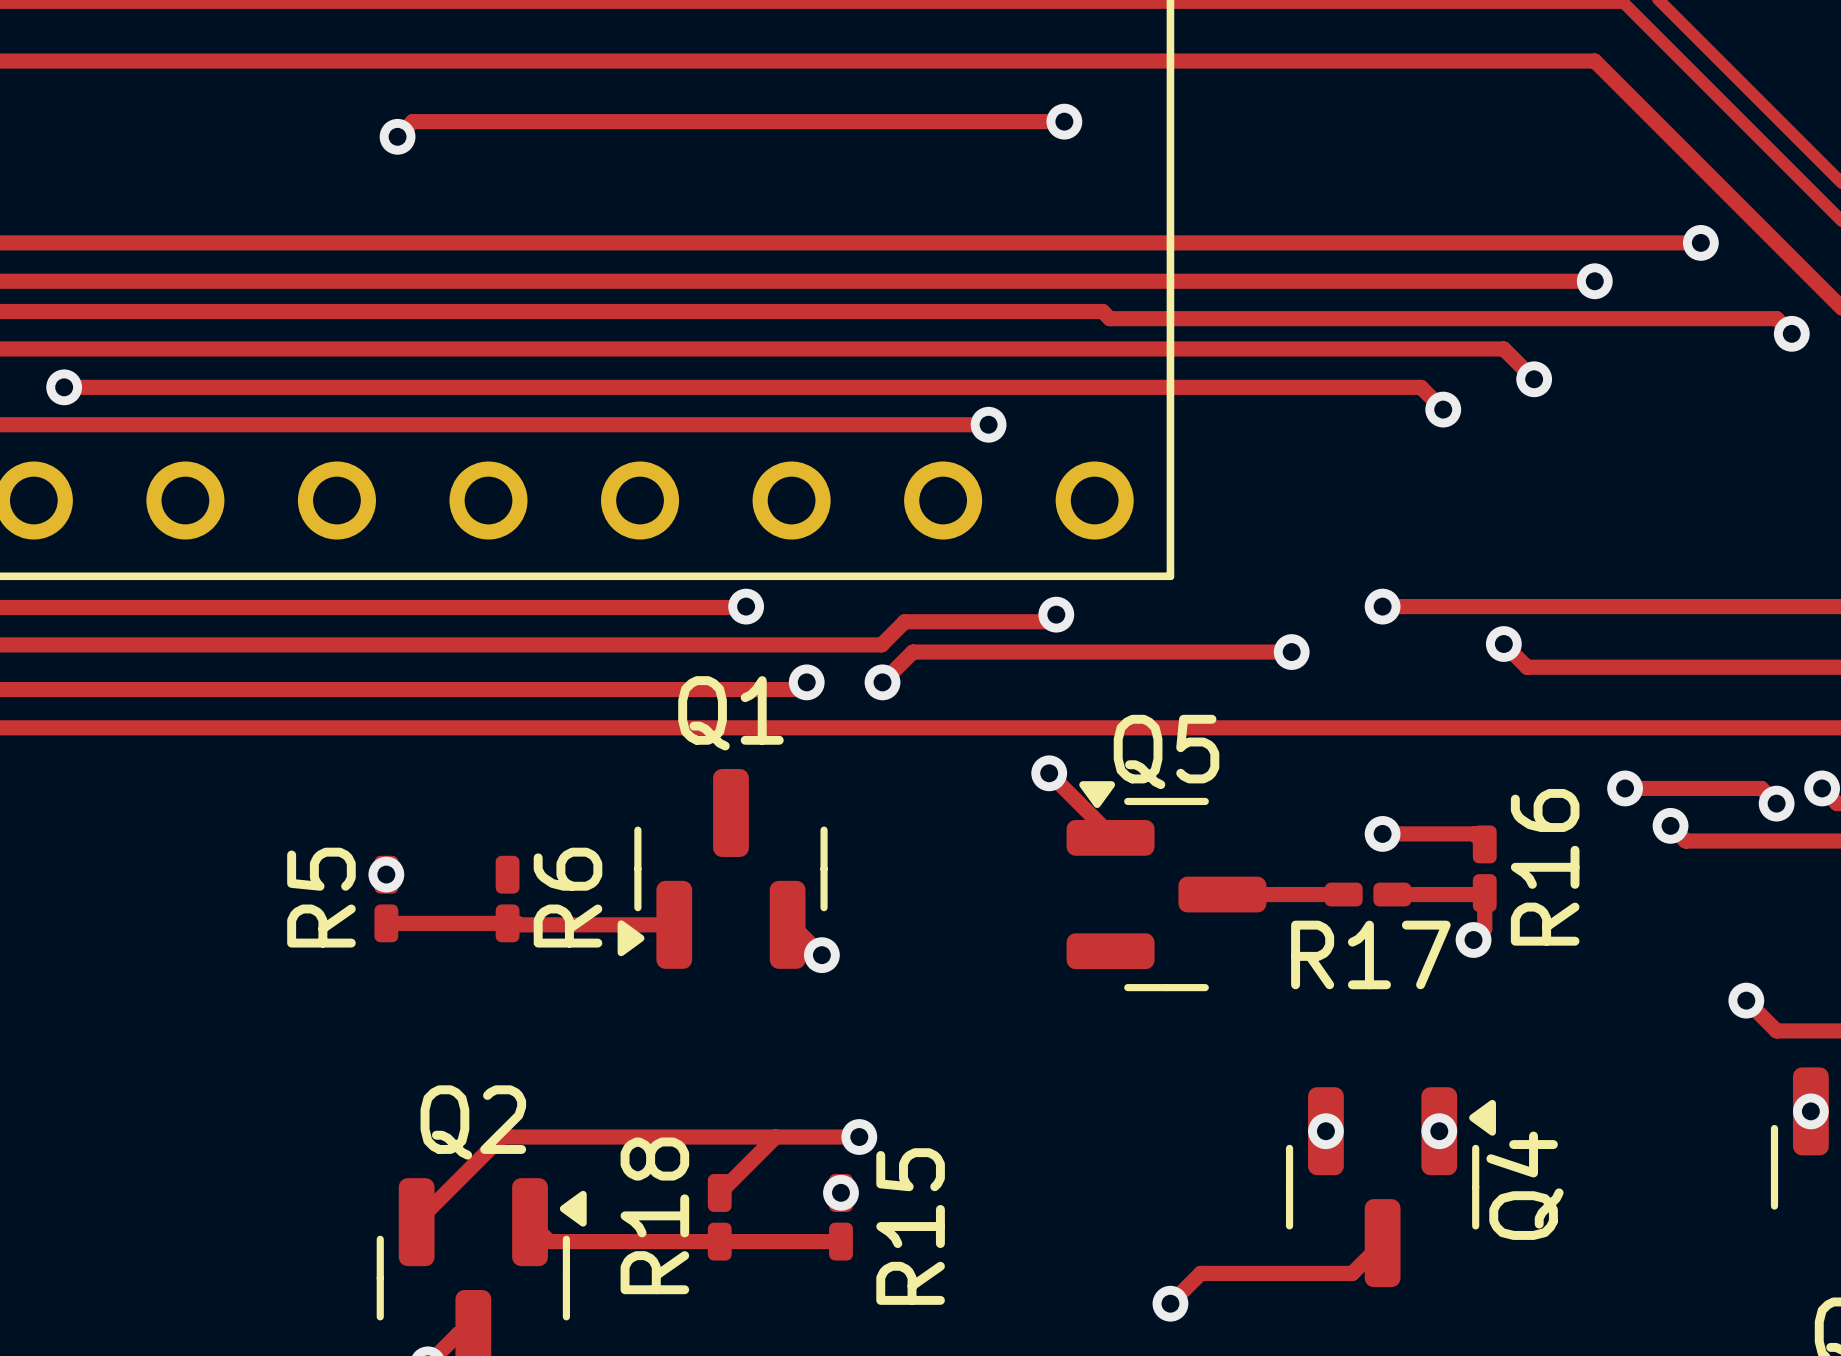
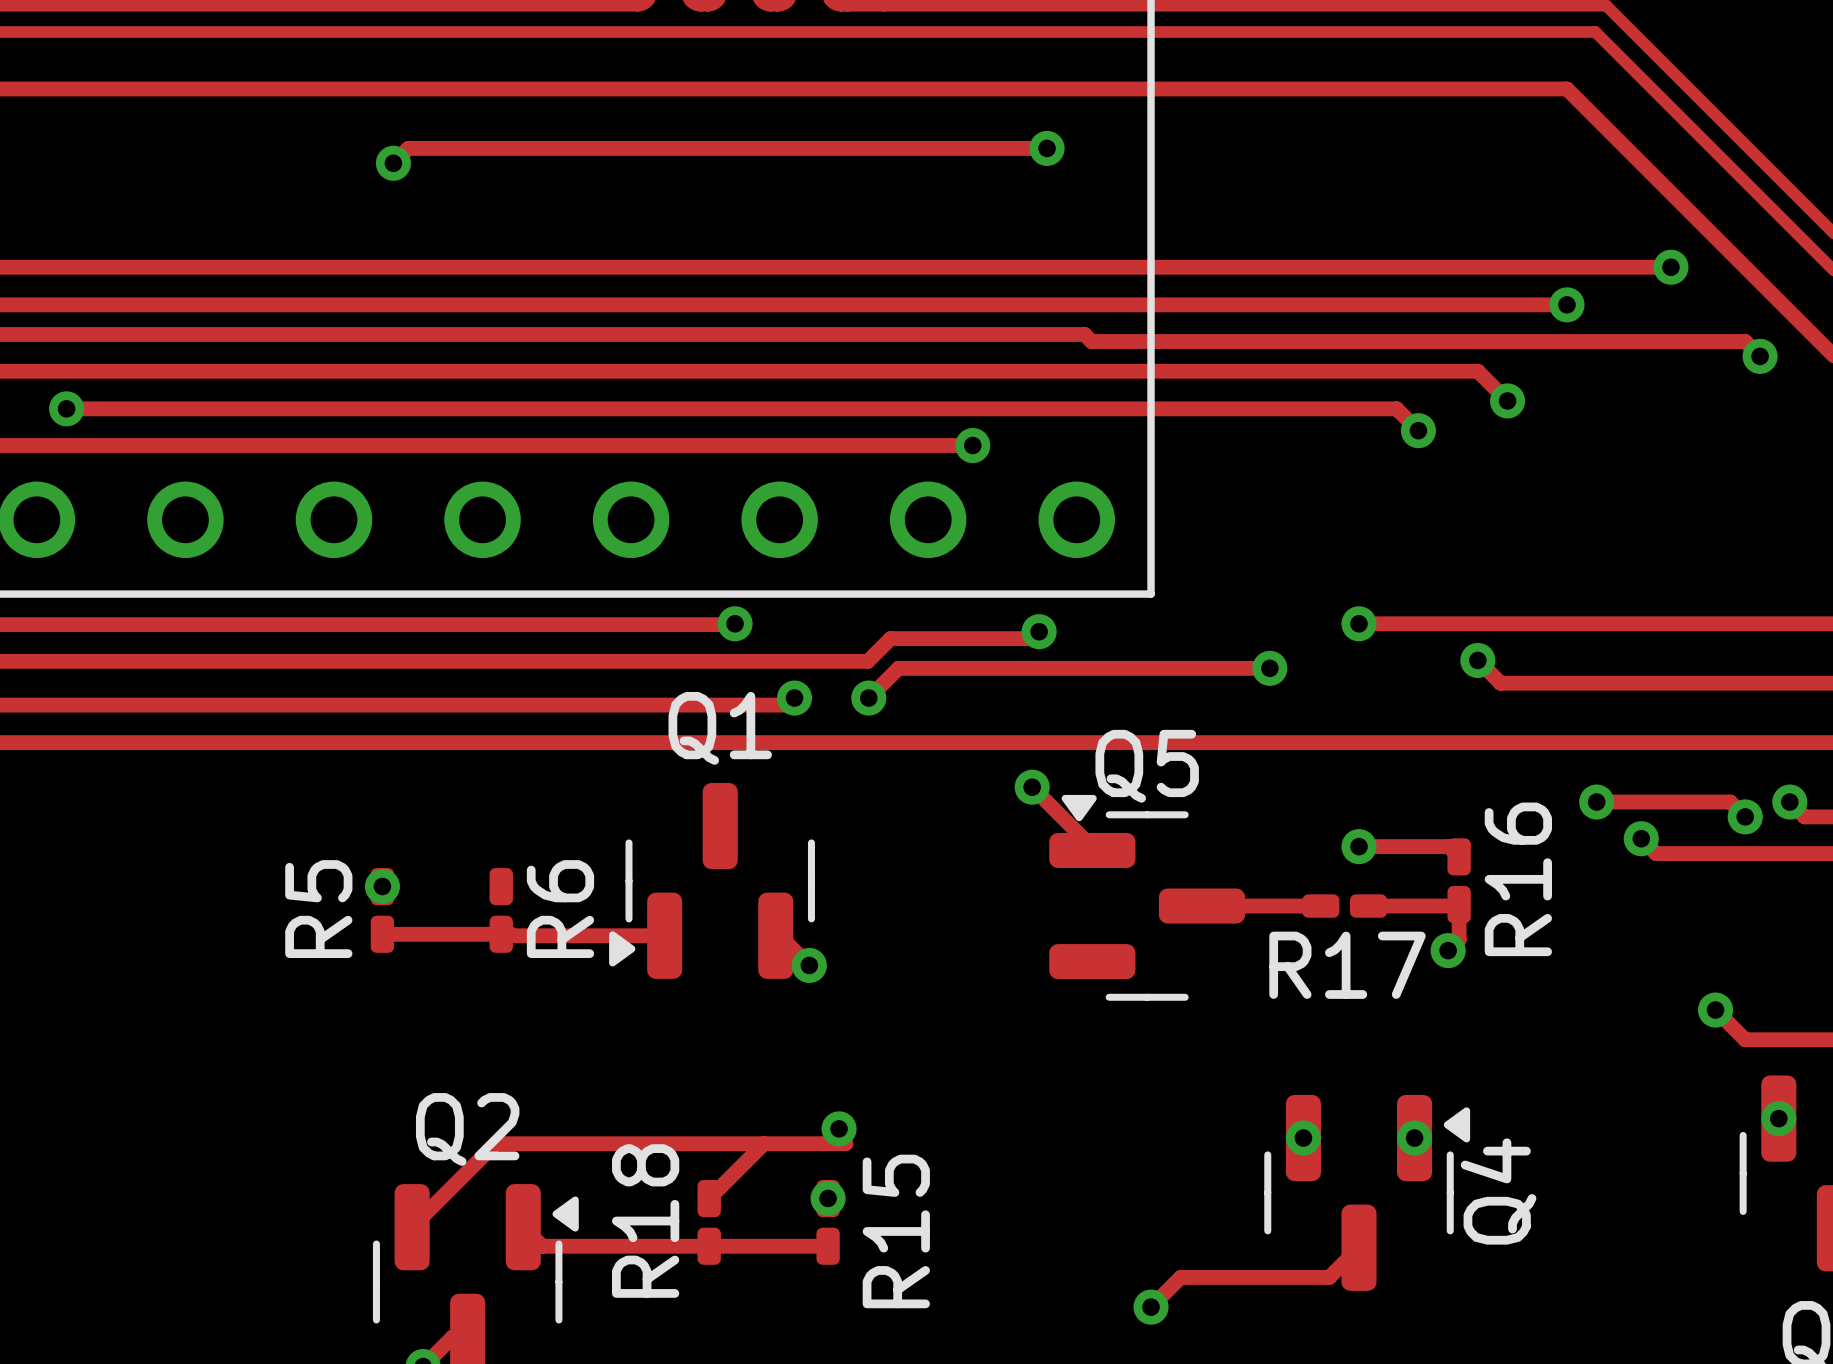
via position: (859, 1137) -> (839, 1128)

